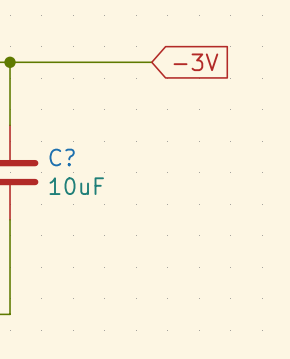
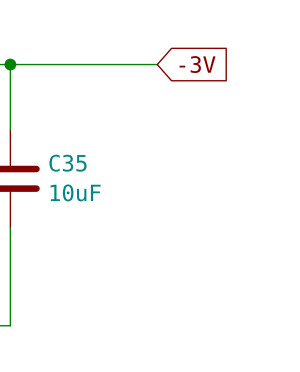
C? name: C? (62, 157) -> C35 (68, 163)

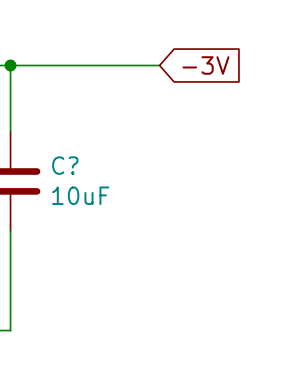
C35 name: C35 (68, 163) -> C? (65, 165)

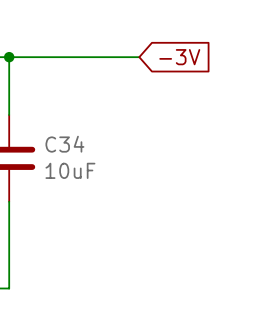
C? name: C? (65, 165) -> C34 (64, 144)

